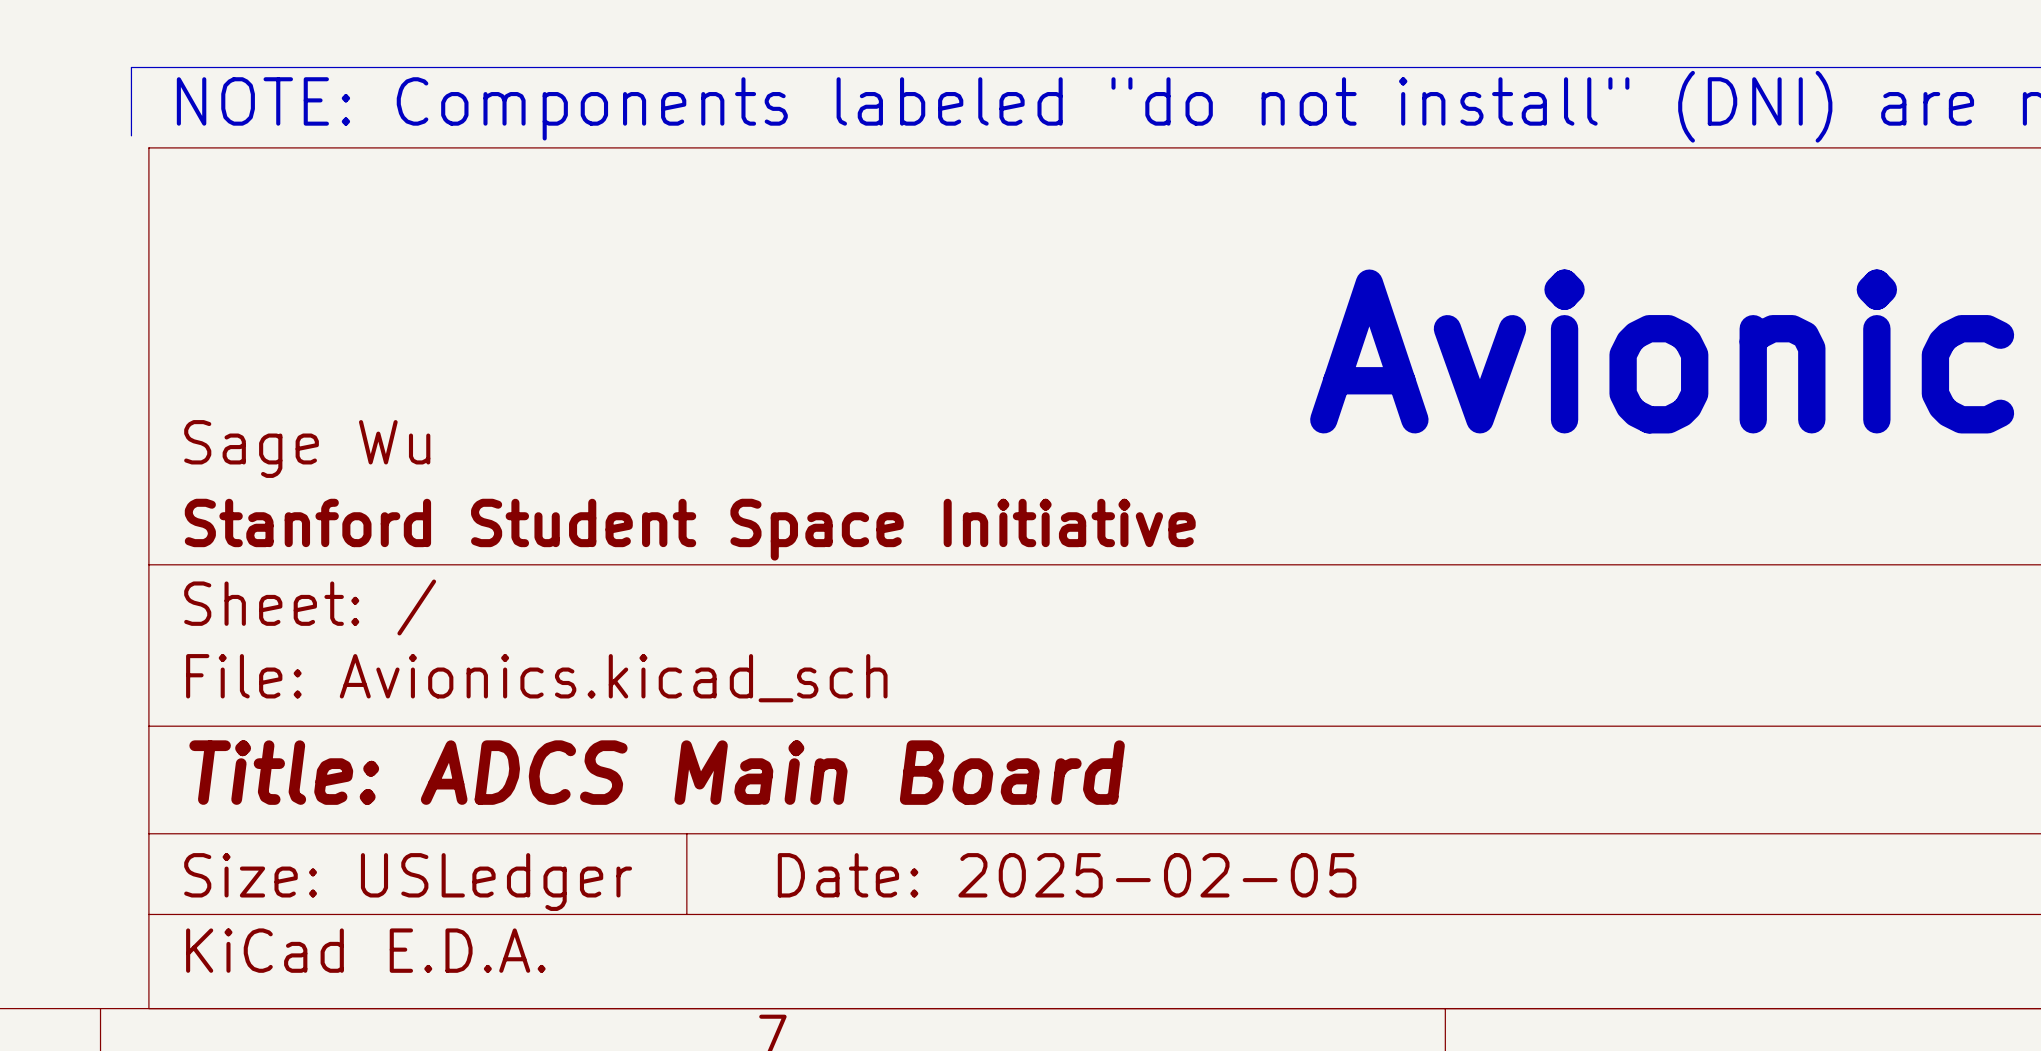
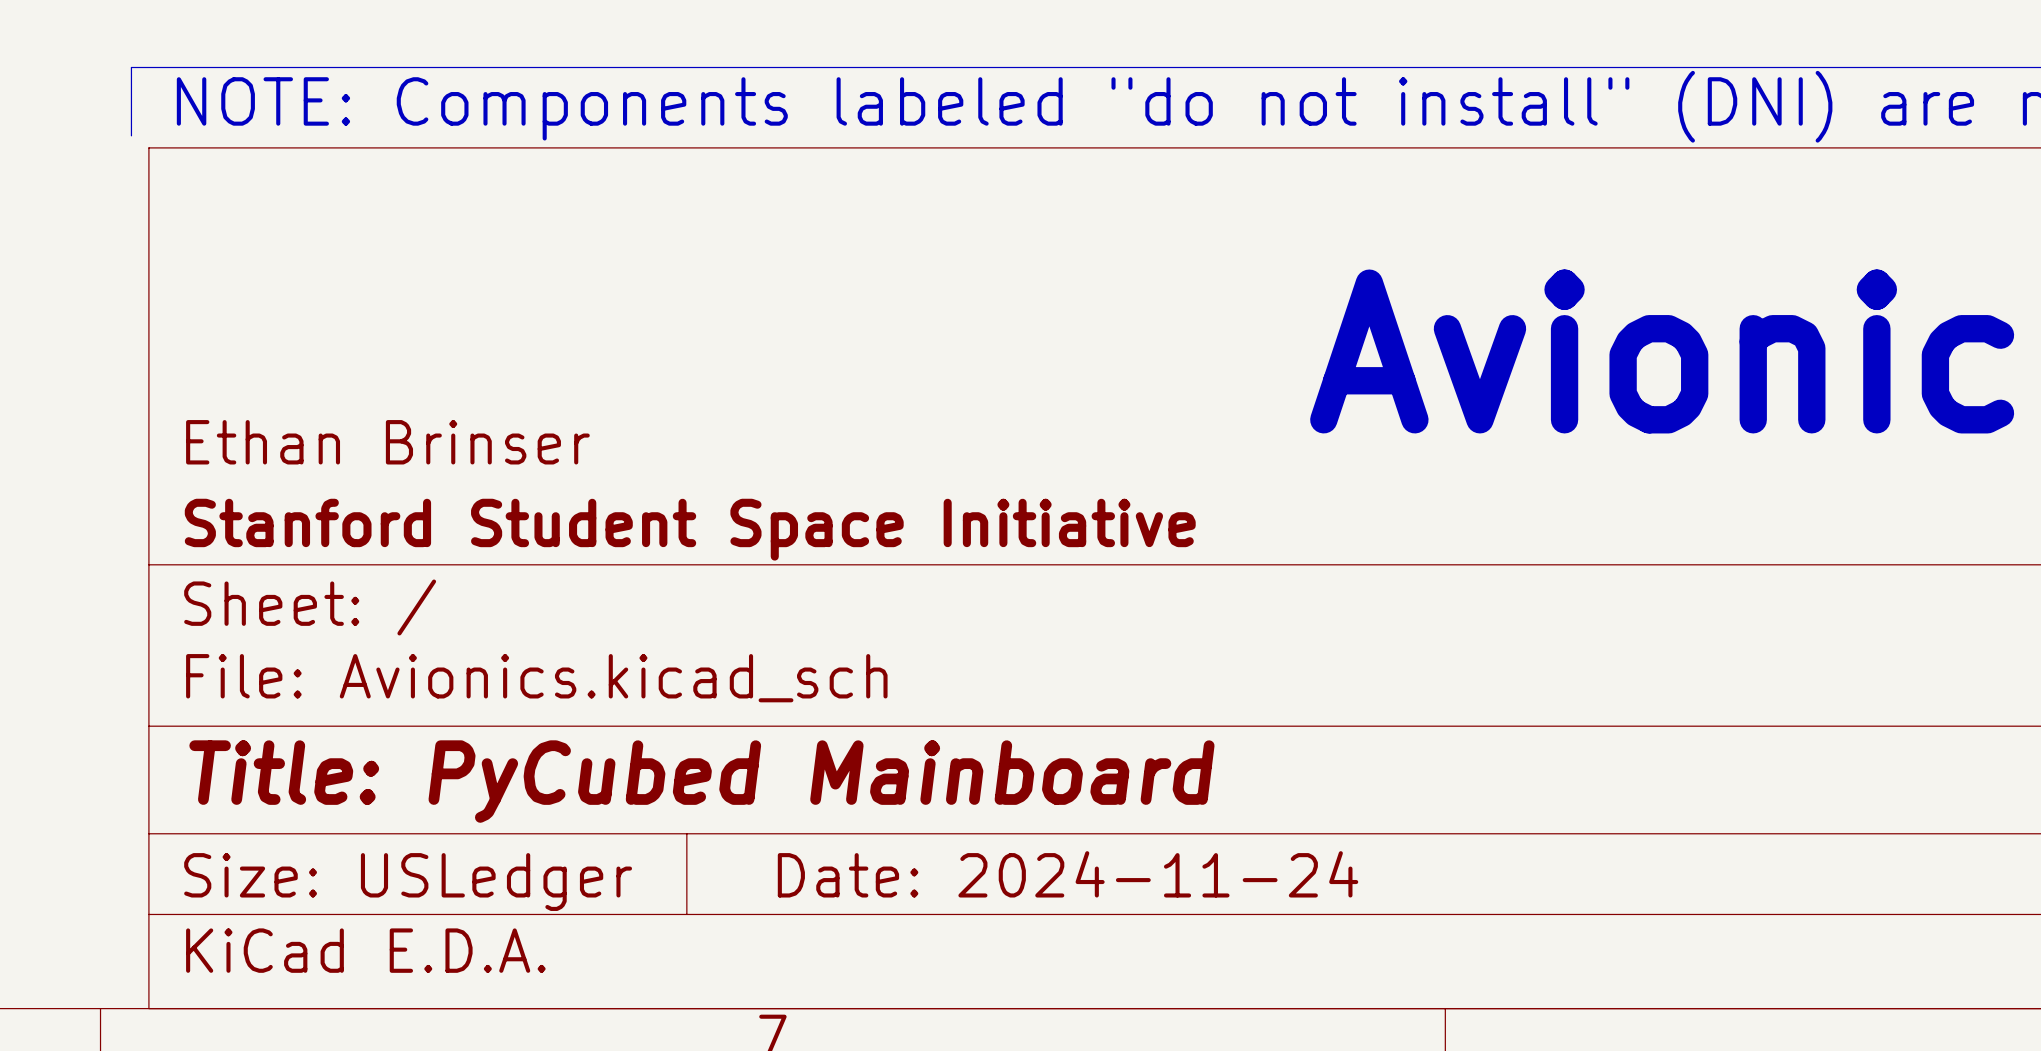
title block: Sage Wu (307, 448) -> Ethan Brinser (387, 442)
title block: Title: ADCS Main Board (657, 772) -> Title: PyCubed Mainboard (701, 781)
title block: Date: 2025-02-05 (1067, 875) -> Date: 2024-11-24 (1068, 874)

